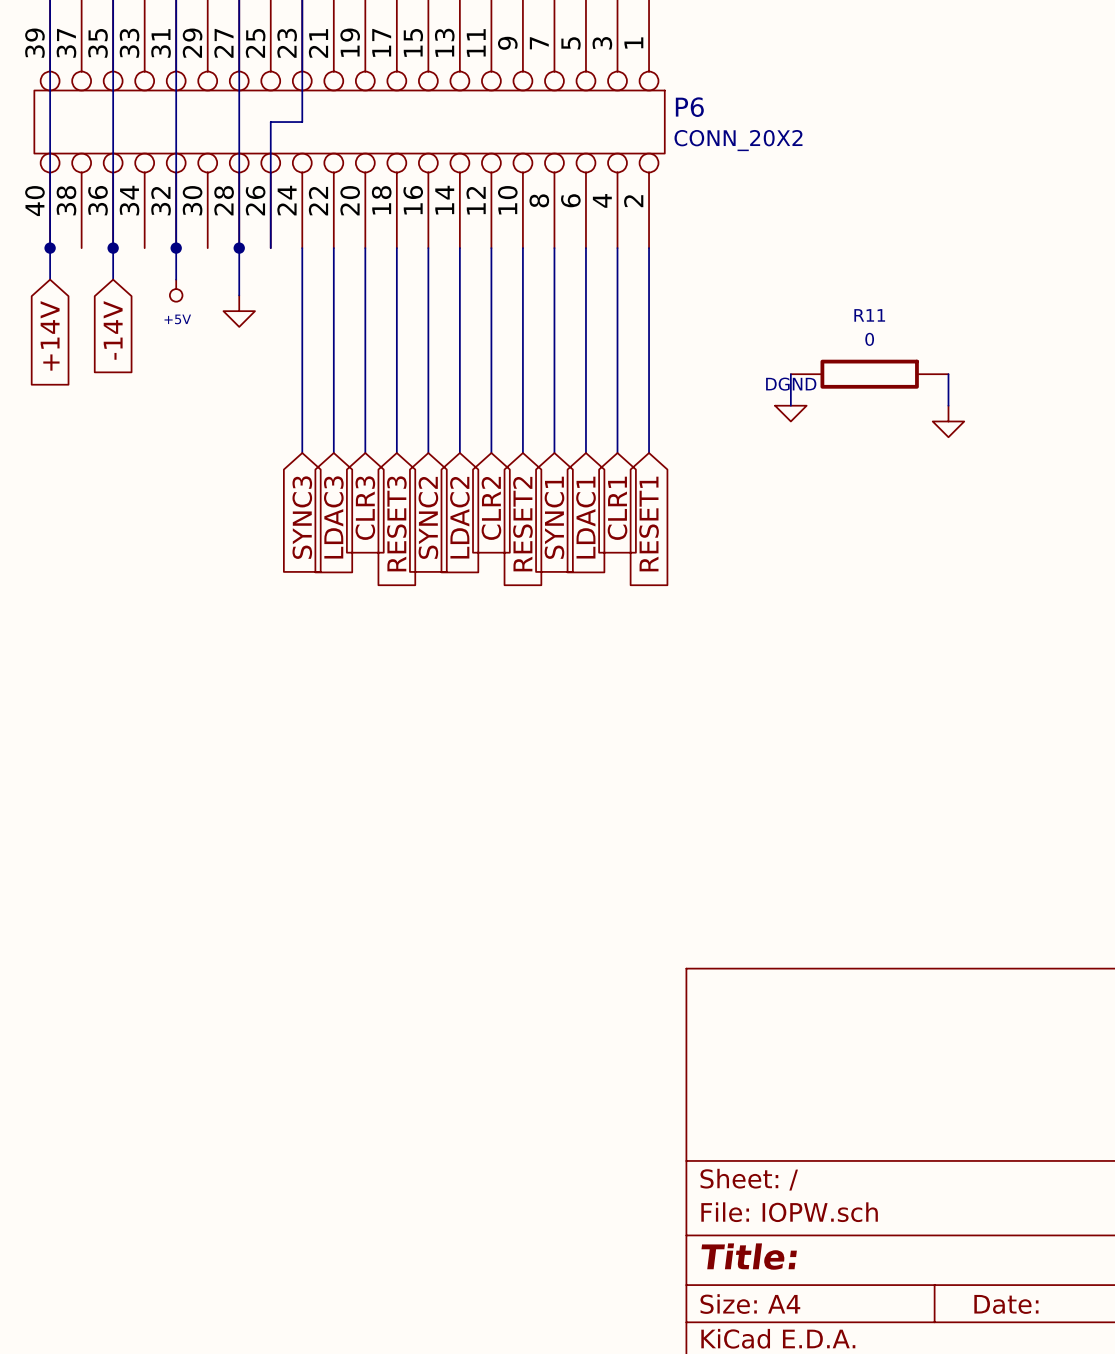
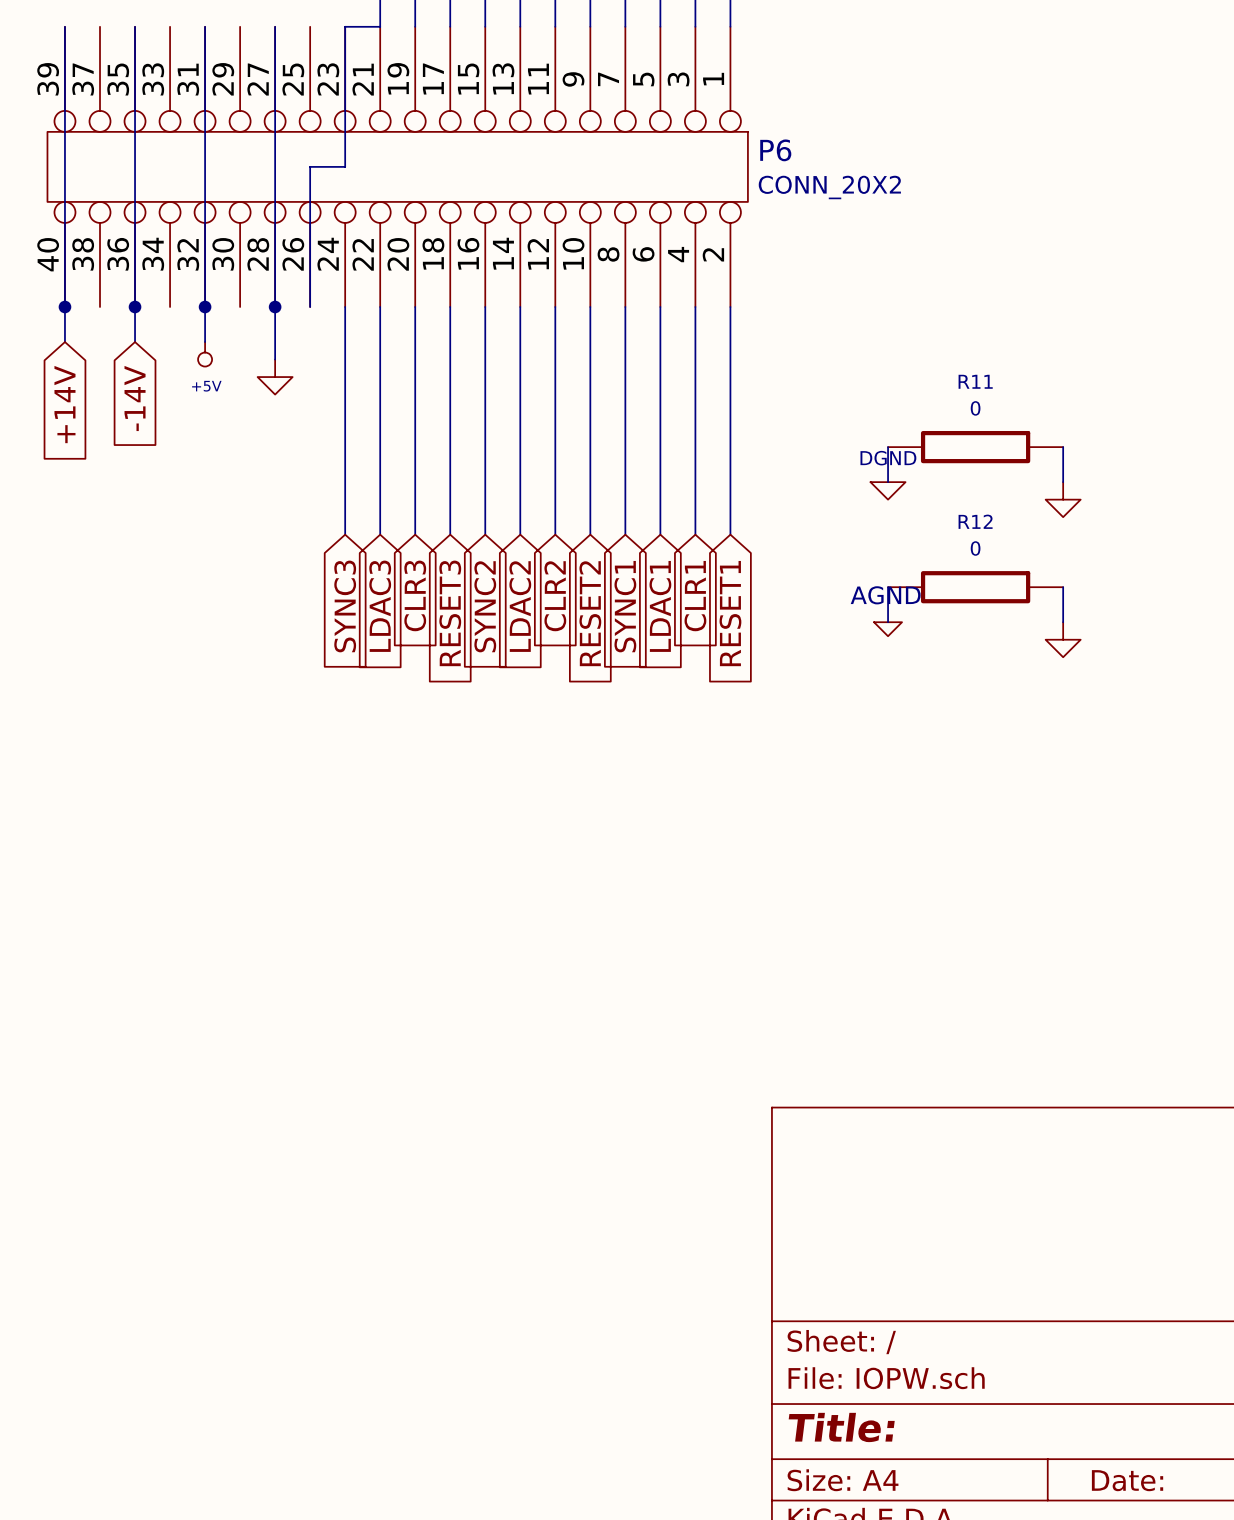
wire: none -> (888, 587) (888, 622)
R12: none -> 0 (975, 587)
wire: none -> (1063, 587) (1063, 622)
power symbol: none -> AGND (888, 629)
power symbol: none -> (1063, 639)

